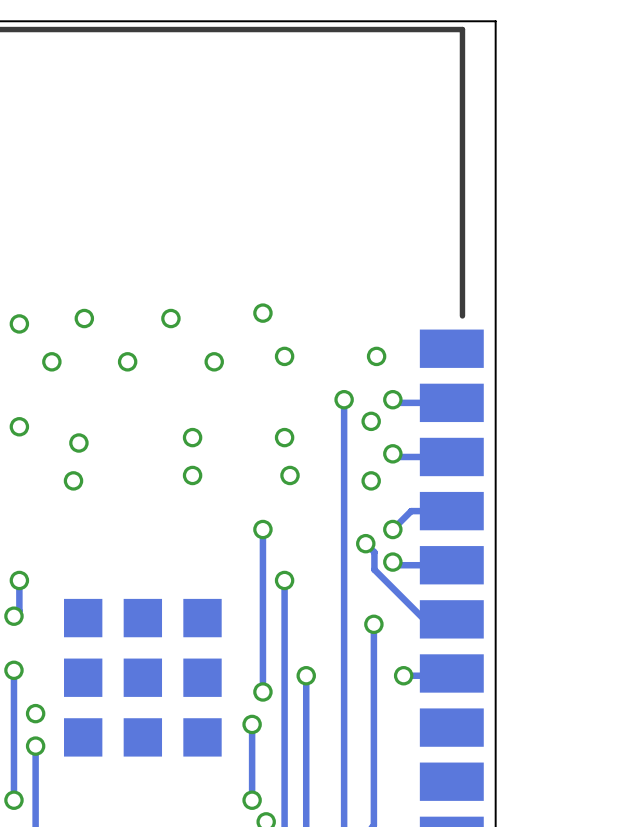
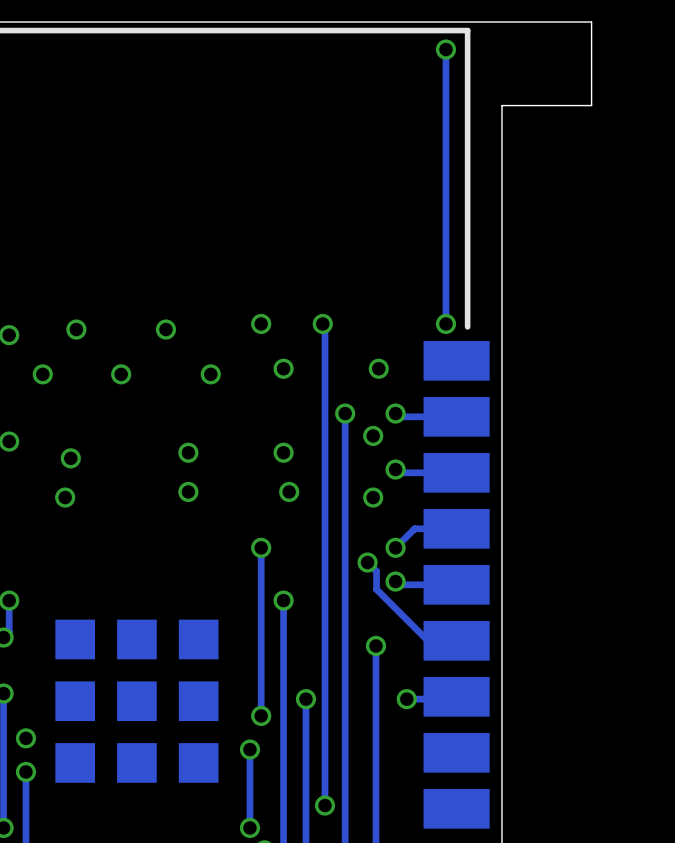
board edge: (495, 21) (495, 102) -> (501, 22) (591, 22) (591, 105) (501, 105)
track: none -> (445, 49) (445, 323)
via: none -> (445, 49)
track: none -> (322, 323) (325, 326) (325, 805)
via: none -> (322, 323)
via: none -> (445, 323)
via: none -> (325, 805)

